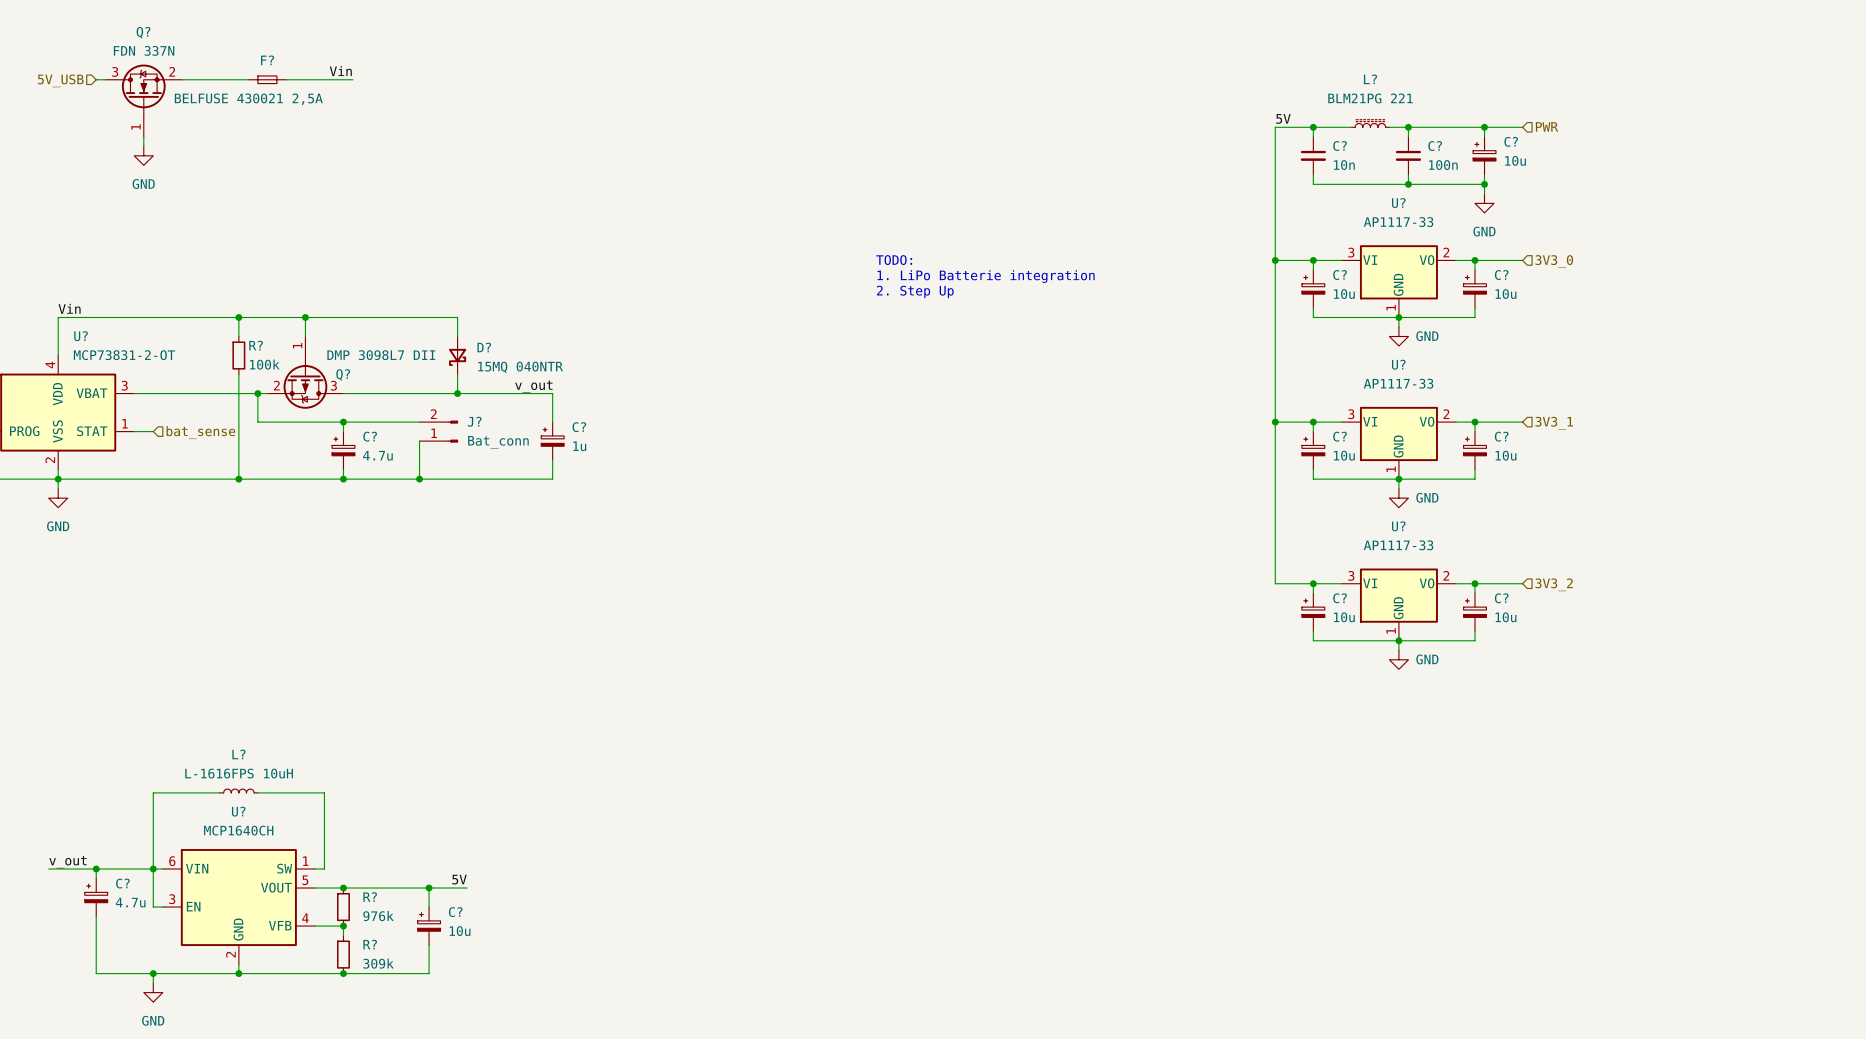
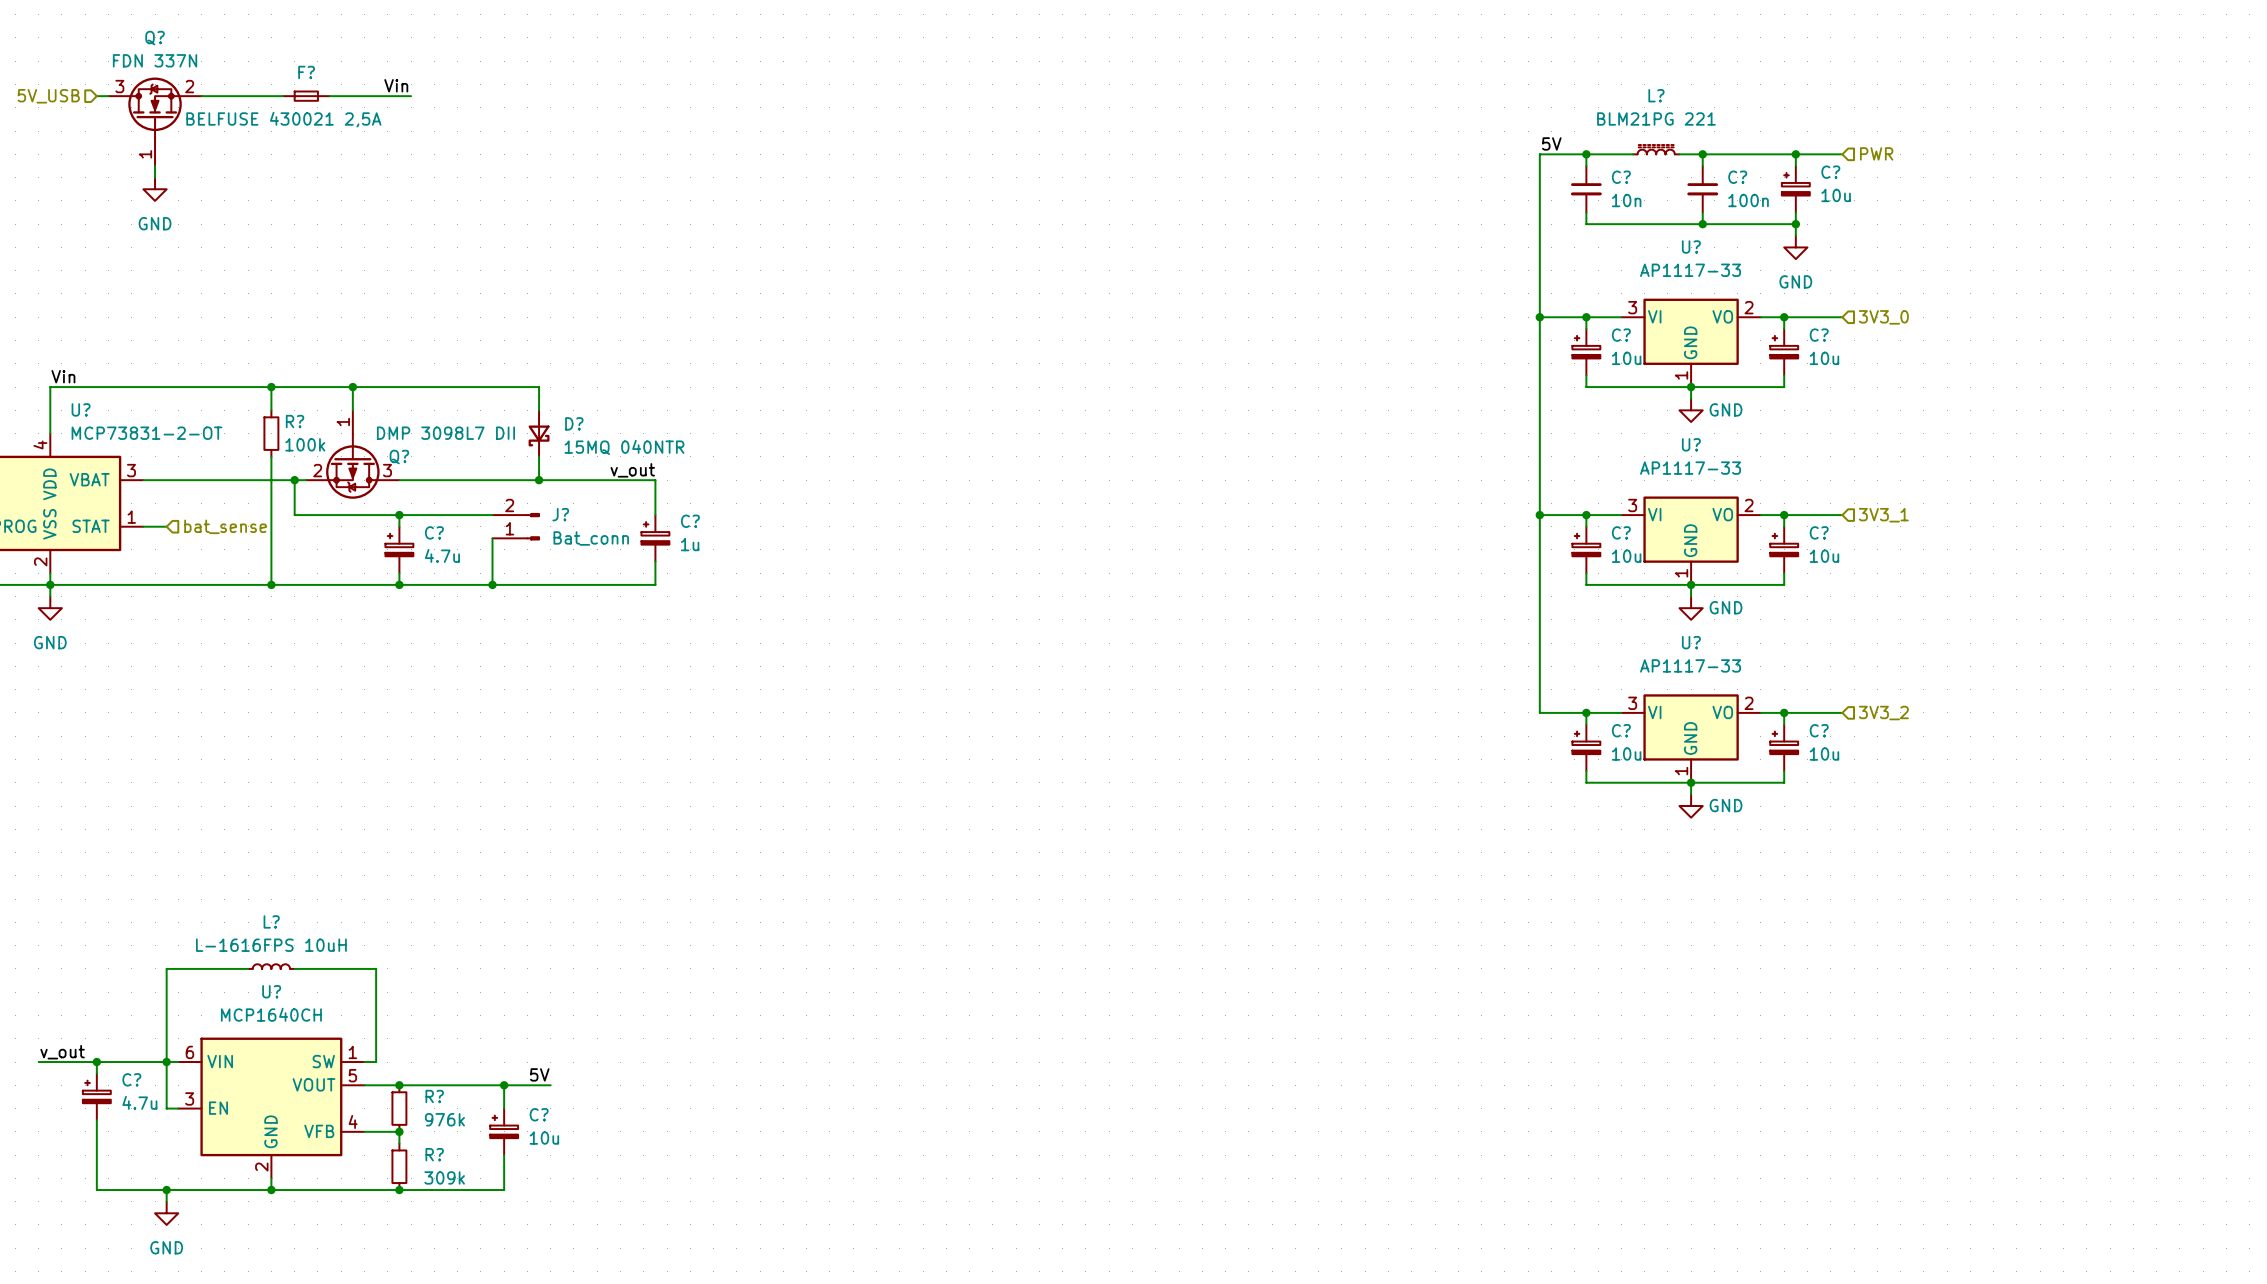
text: TODO: (894, 260) -> none
text: 1. LiPo Batterie integration (986, 276) -> none
text: 2. Step Up (915, 291) -> none

